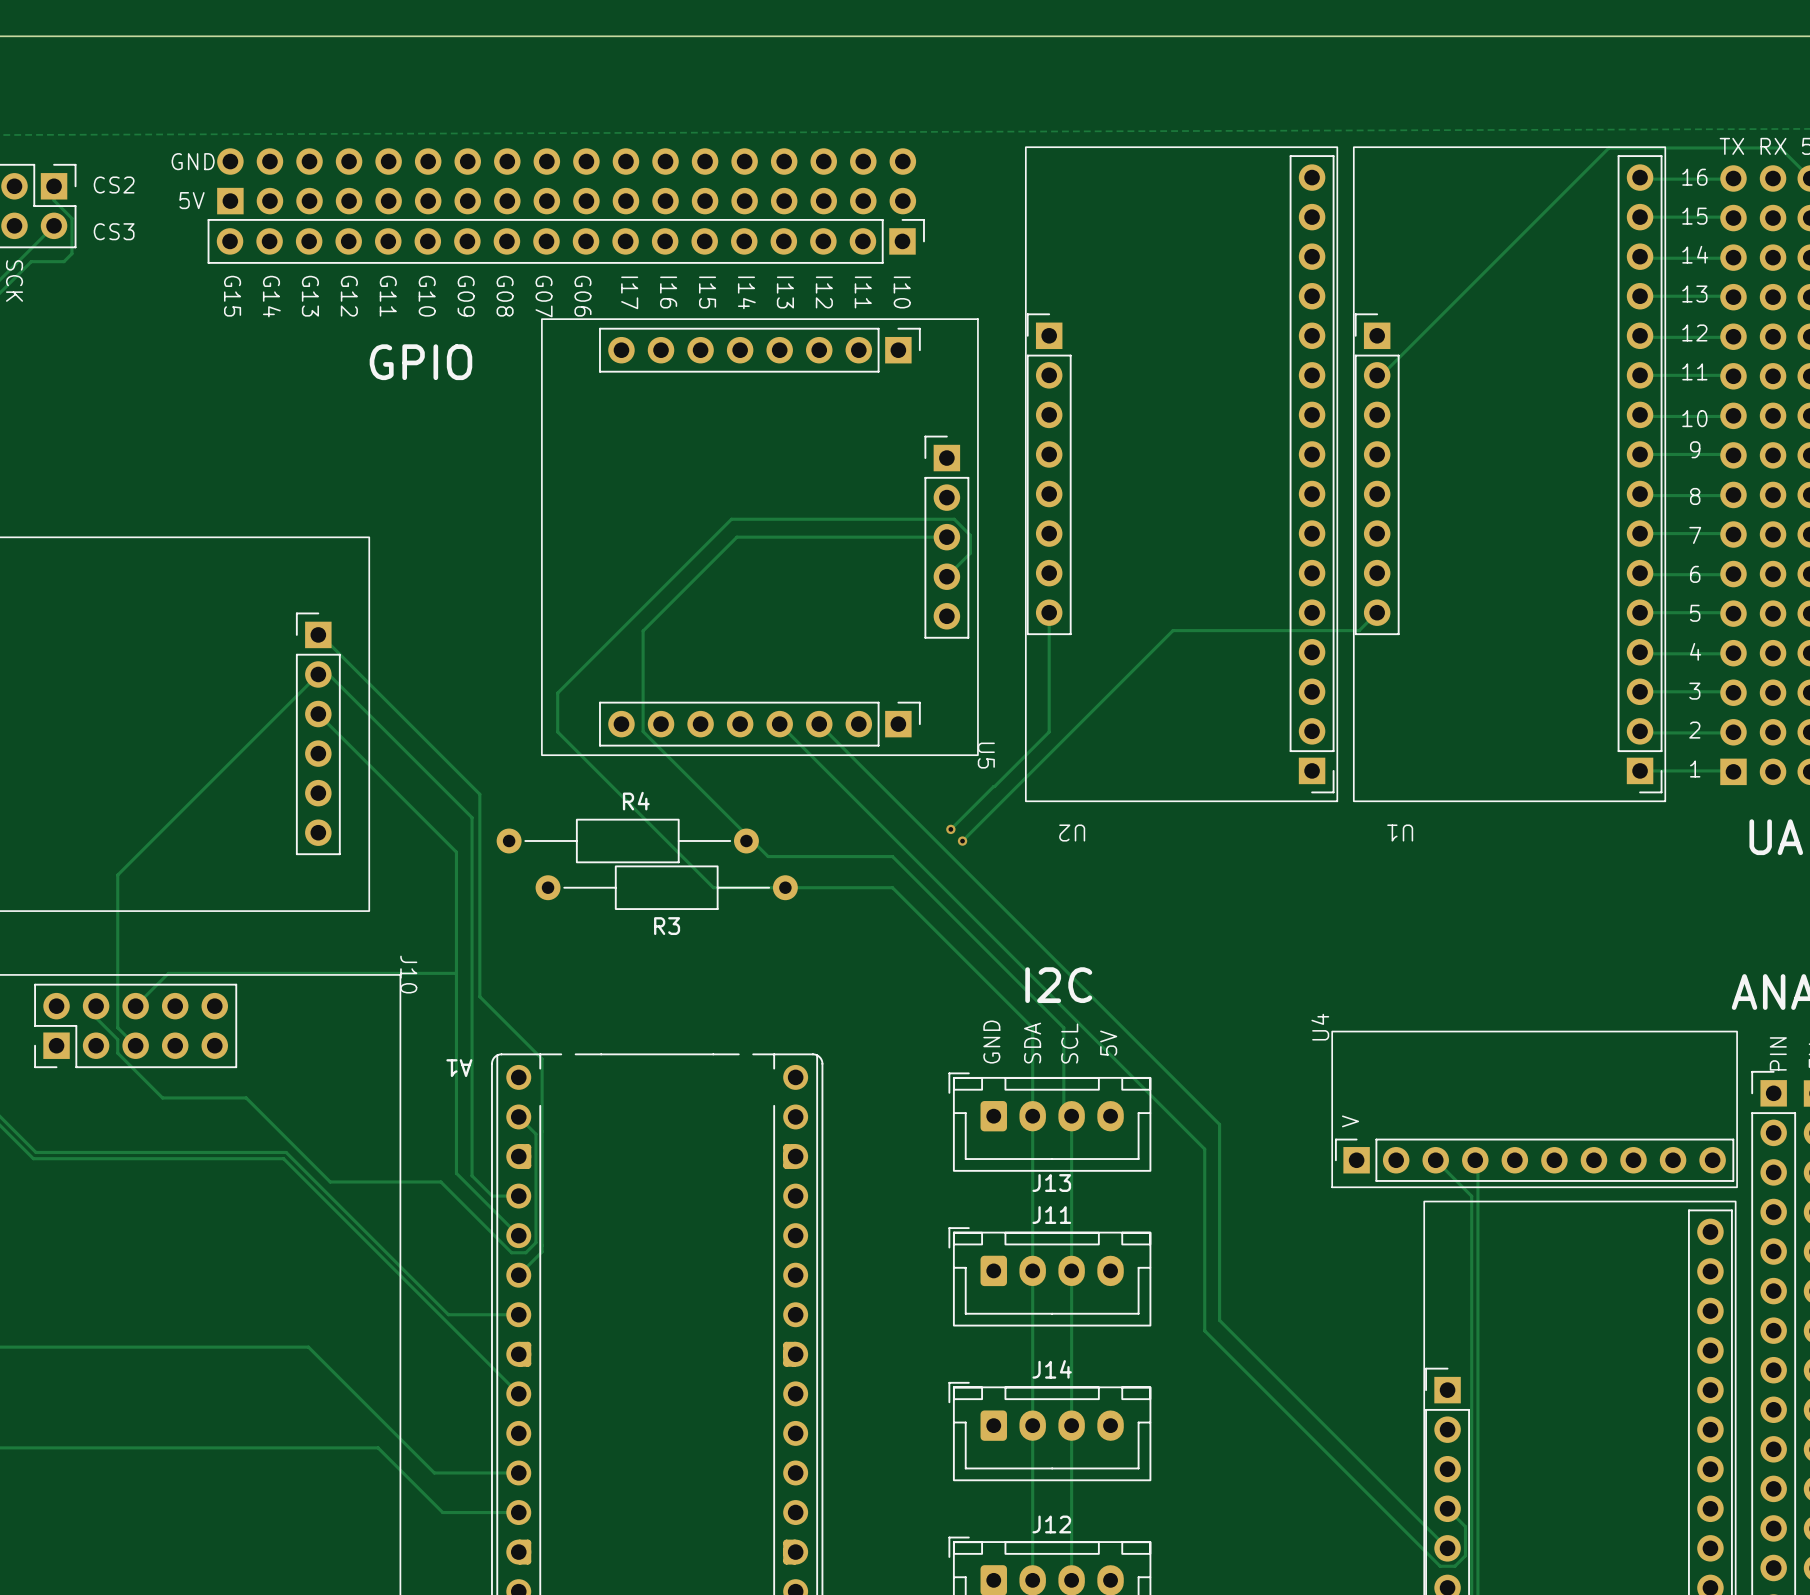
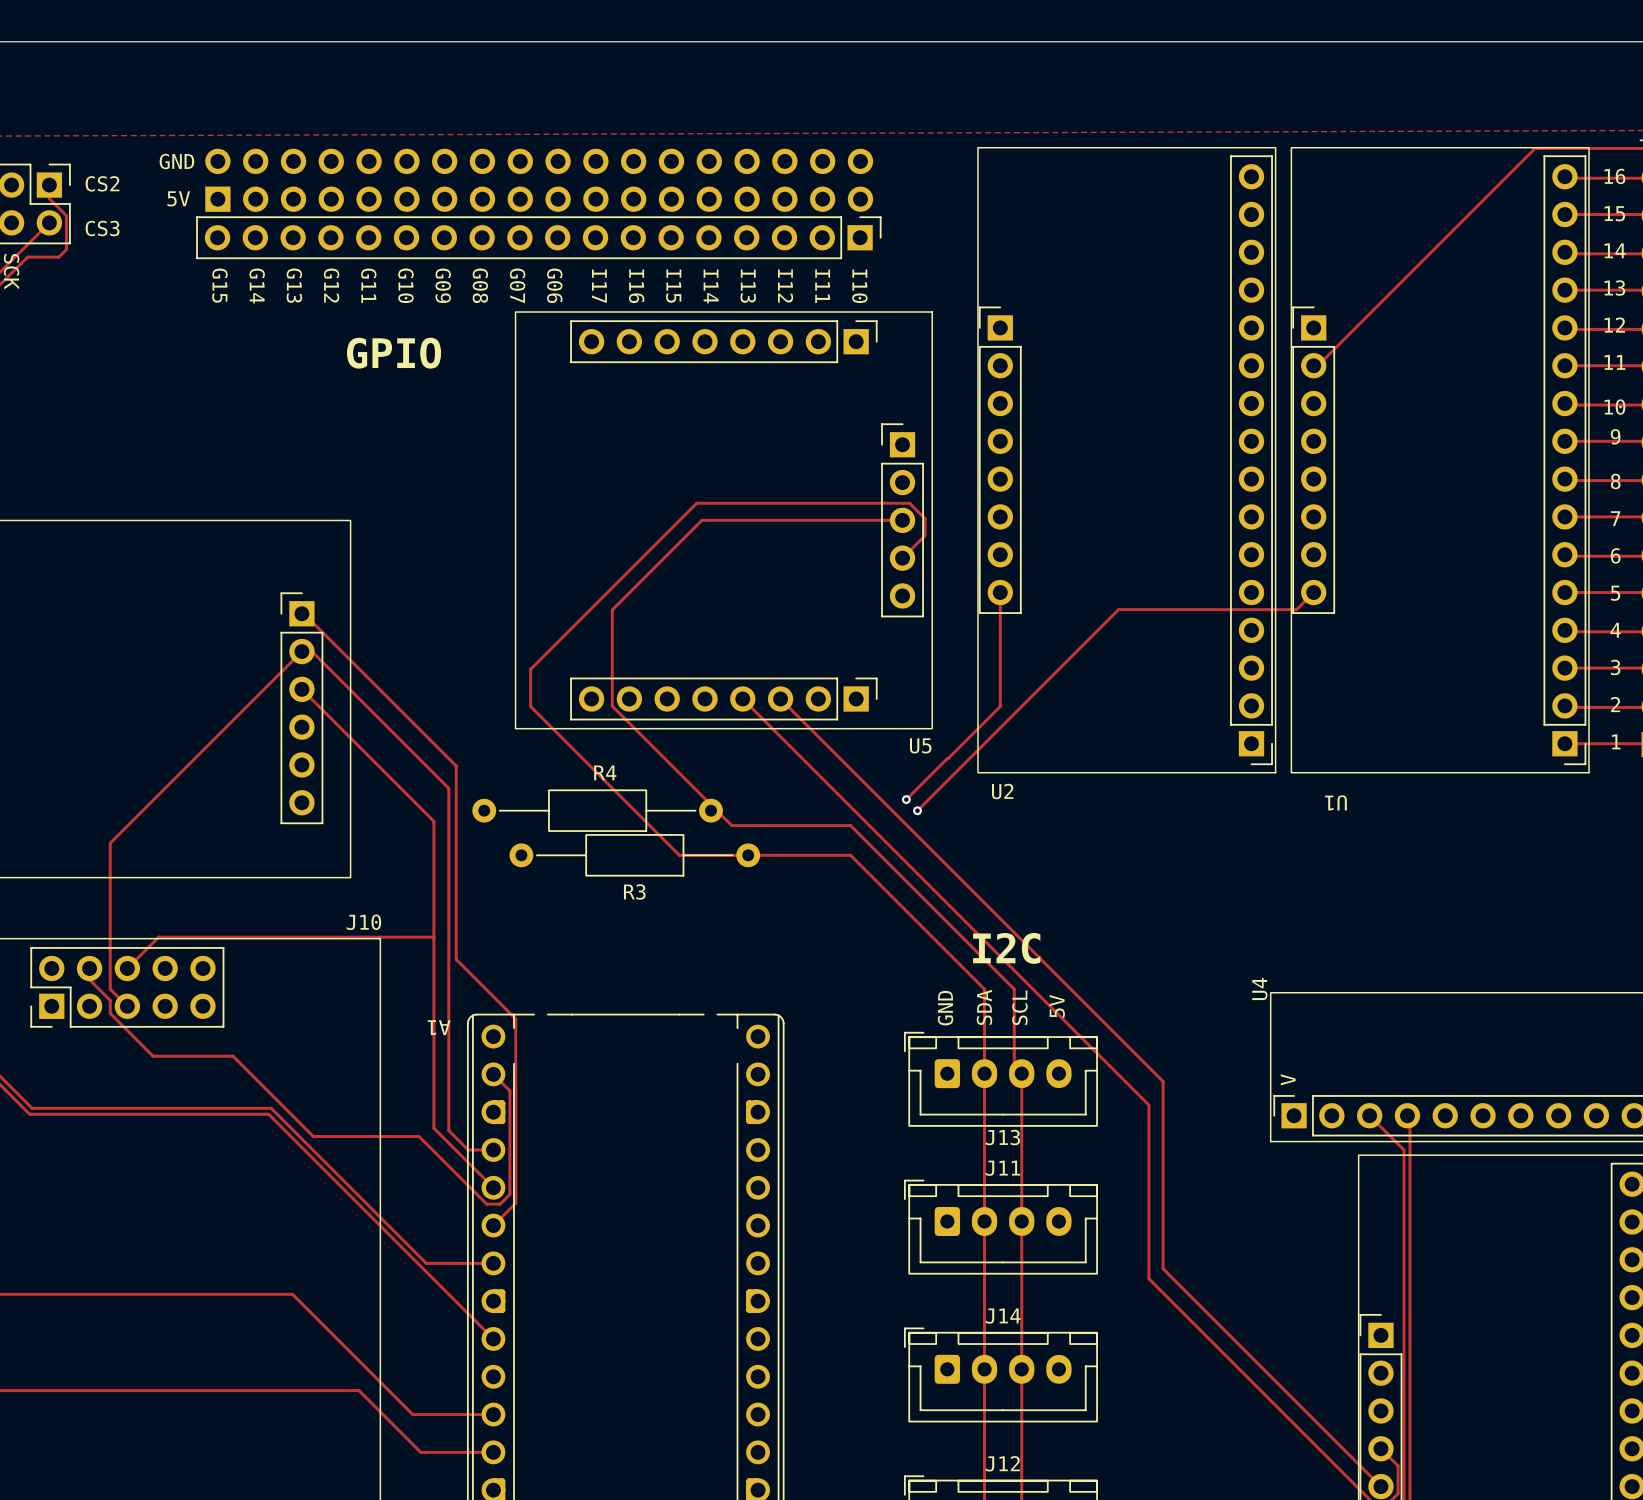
U5 name rotation: 0° (986, 755) -> 90° counterclockwise (920, 745)
U2 name rotation: 0° (1072, 833) -> 180° (1002, 791)
J10 name rotation: 0° (408, 974) -> 90° counterclockwise (363, 922)

